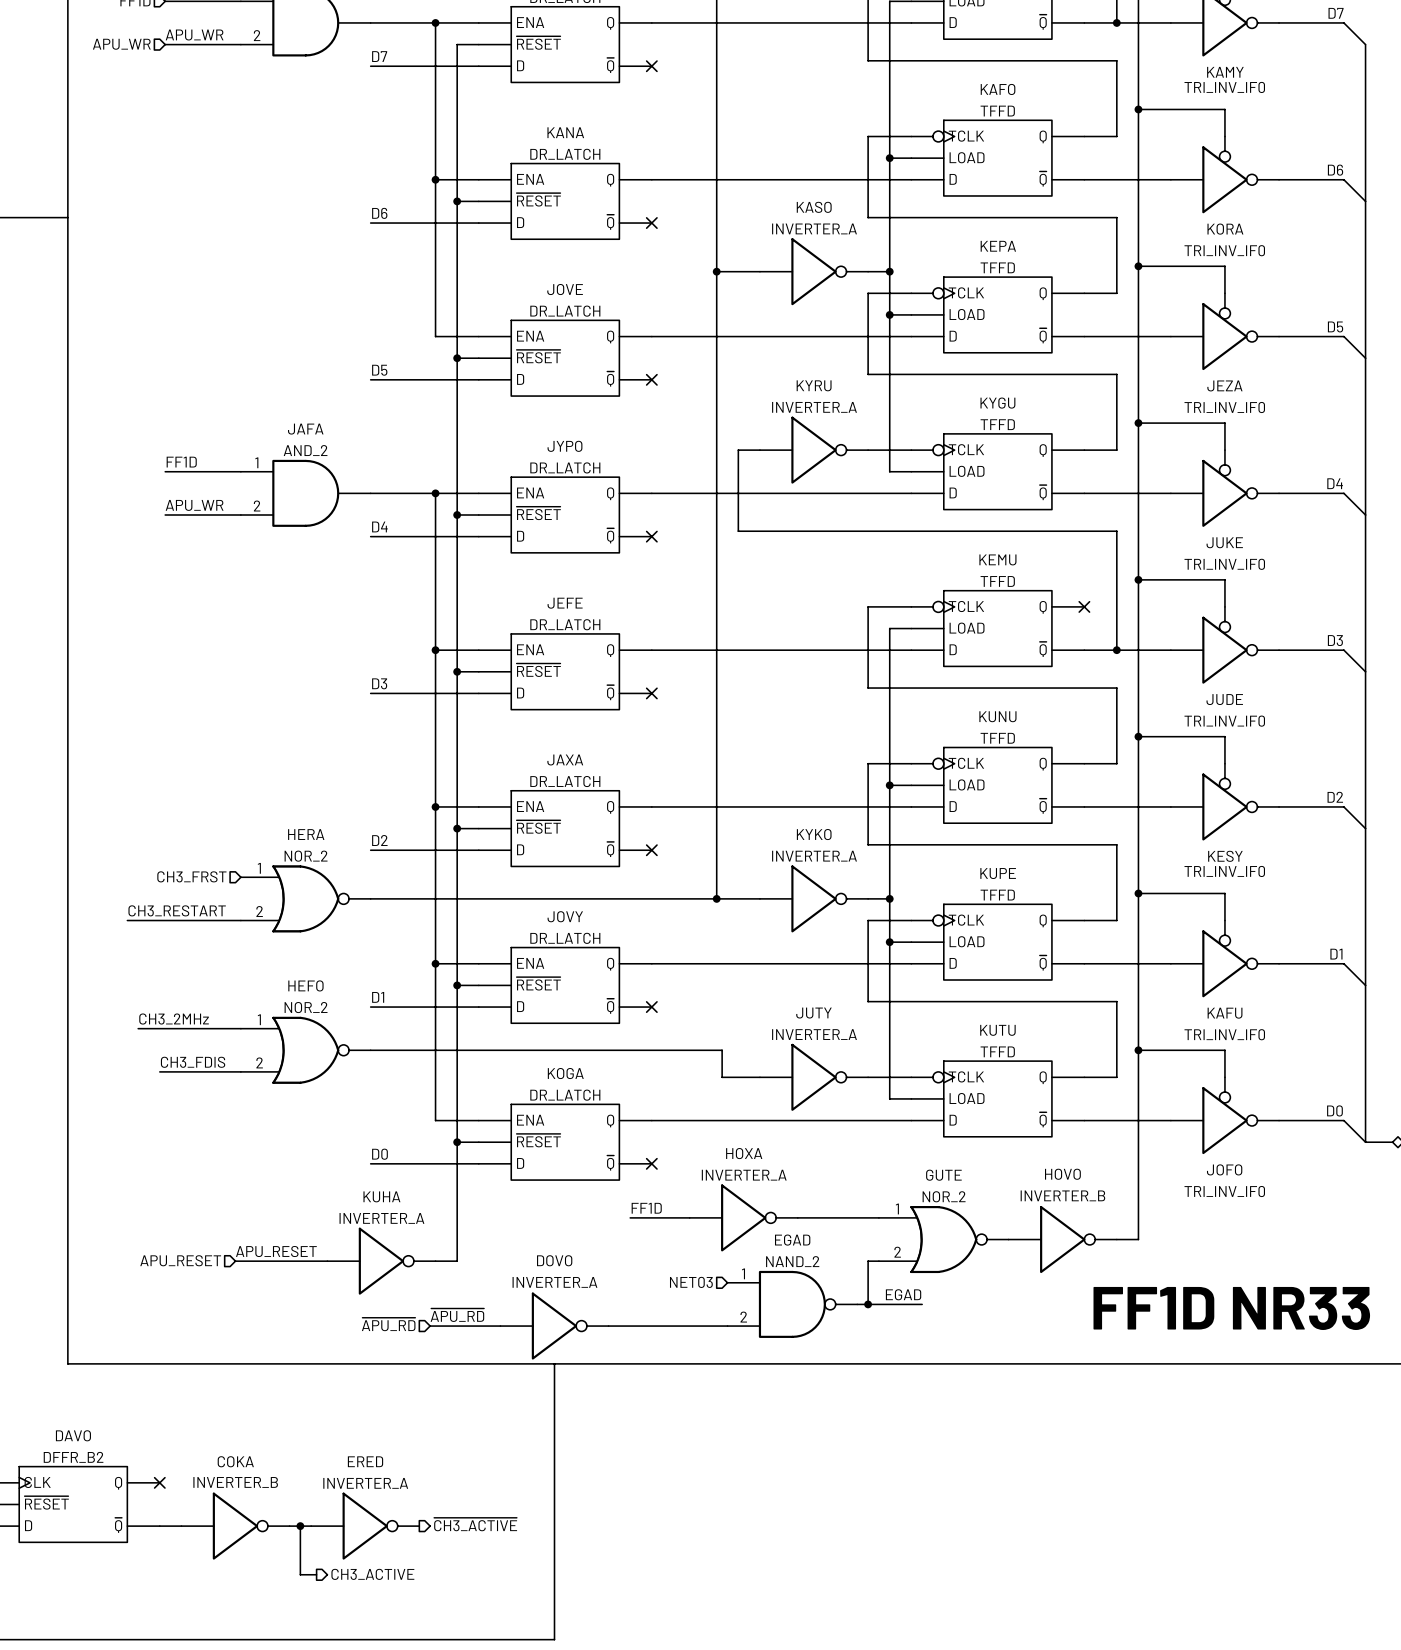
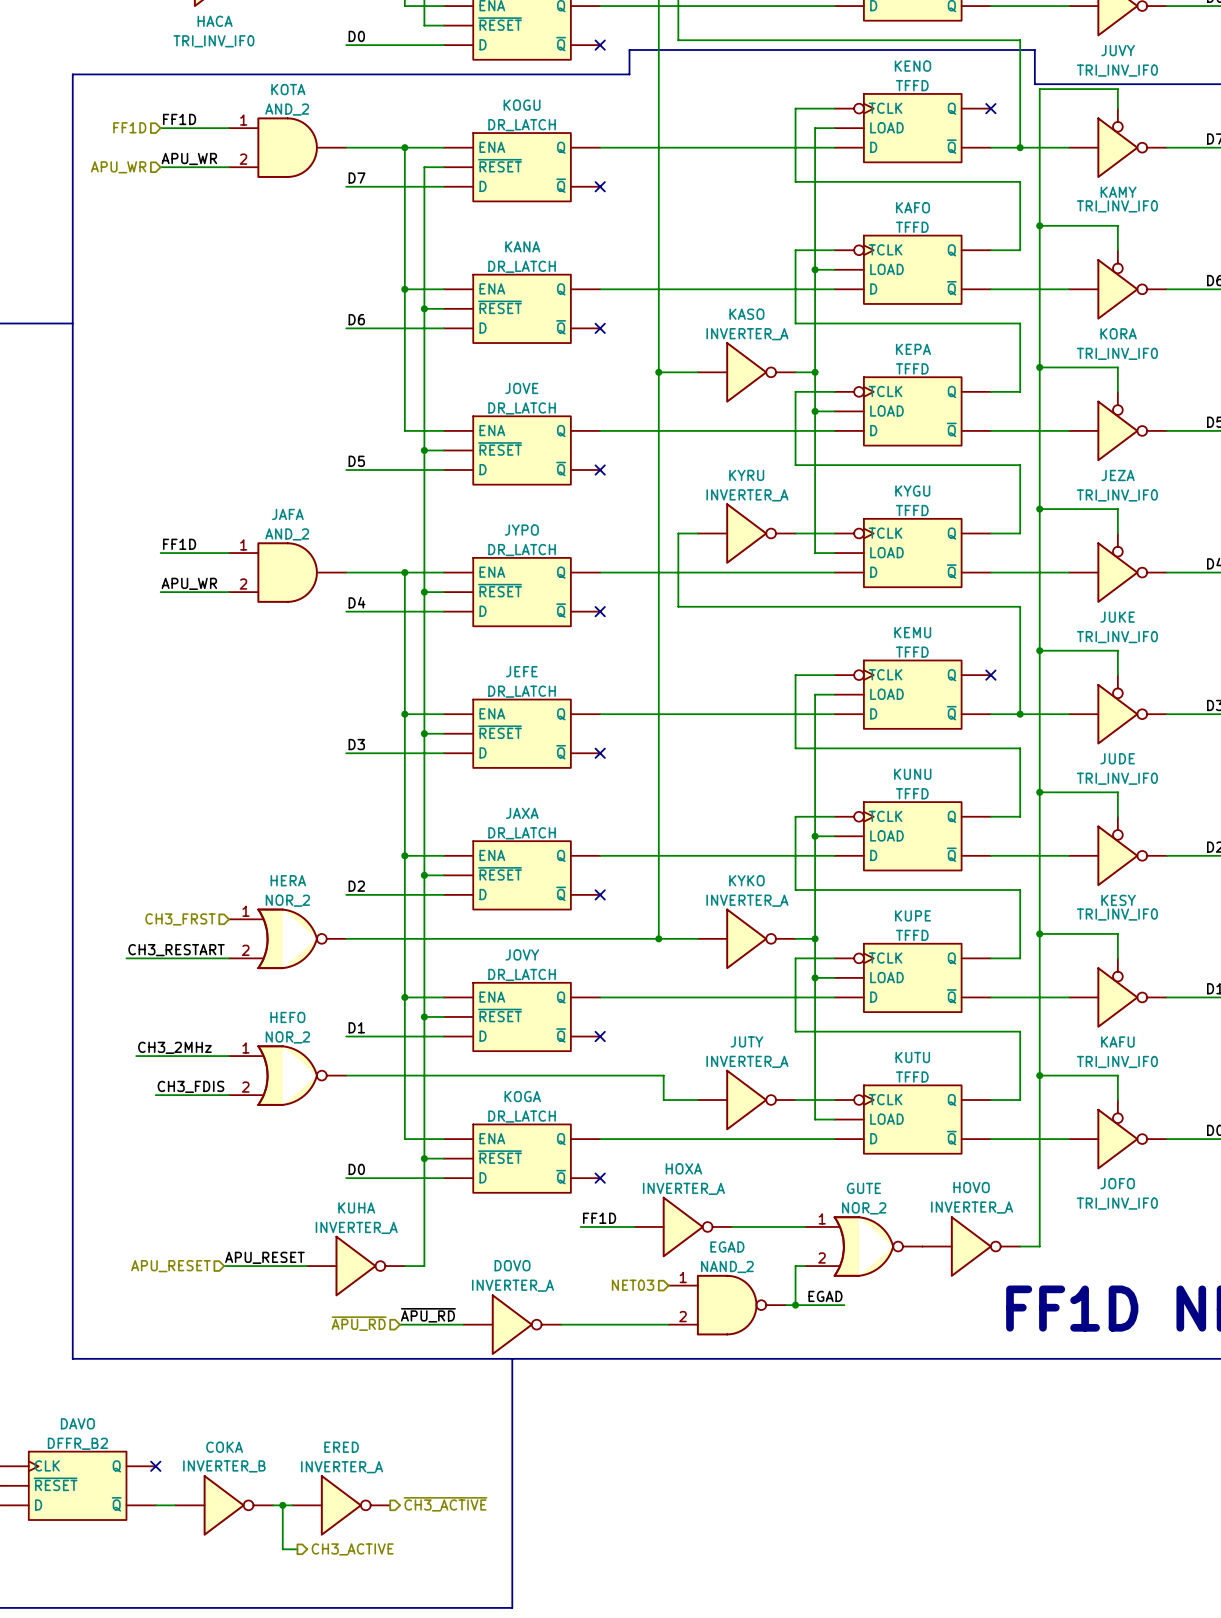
HOVO value: INVERTER_B (1062, 1195) -> INVERTER_A (972, 1207)

